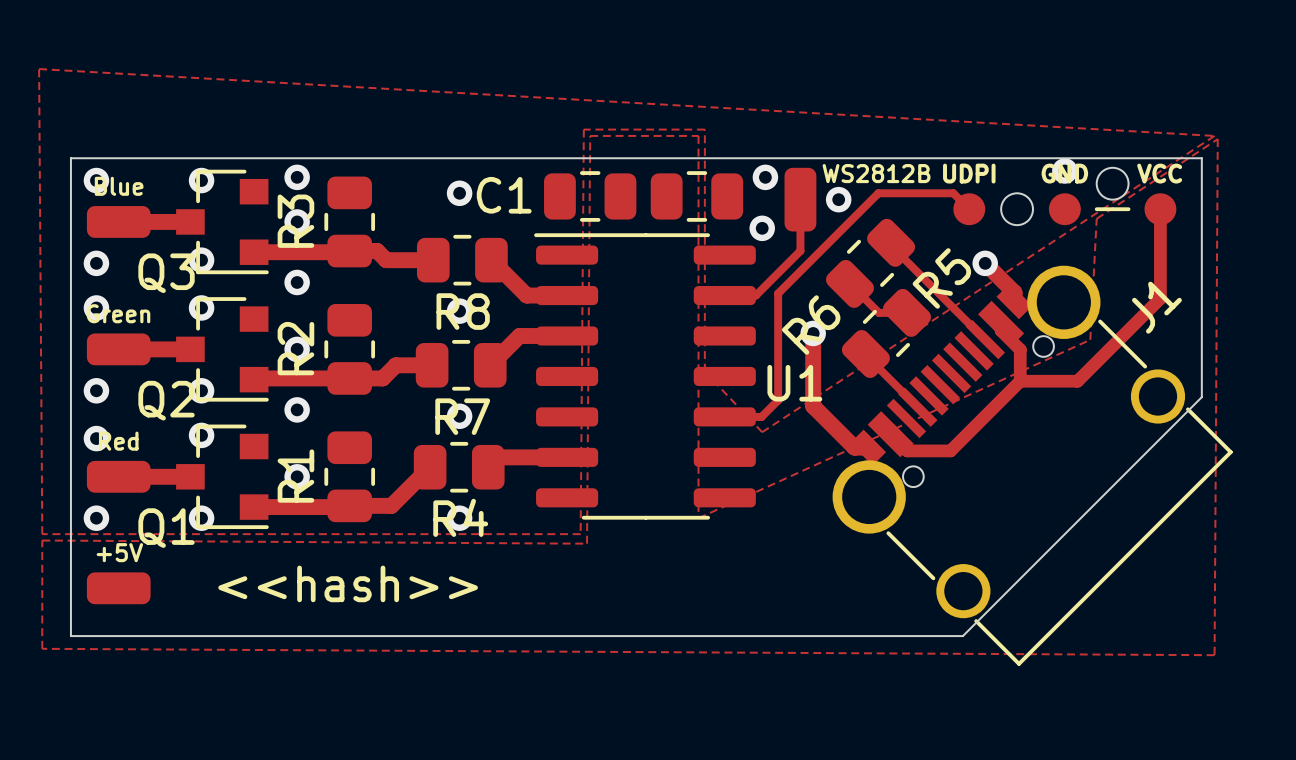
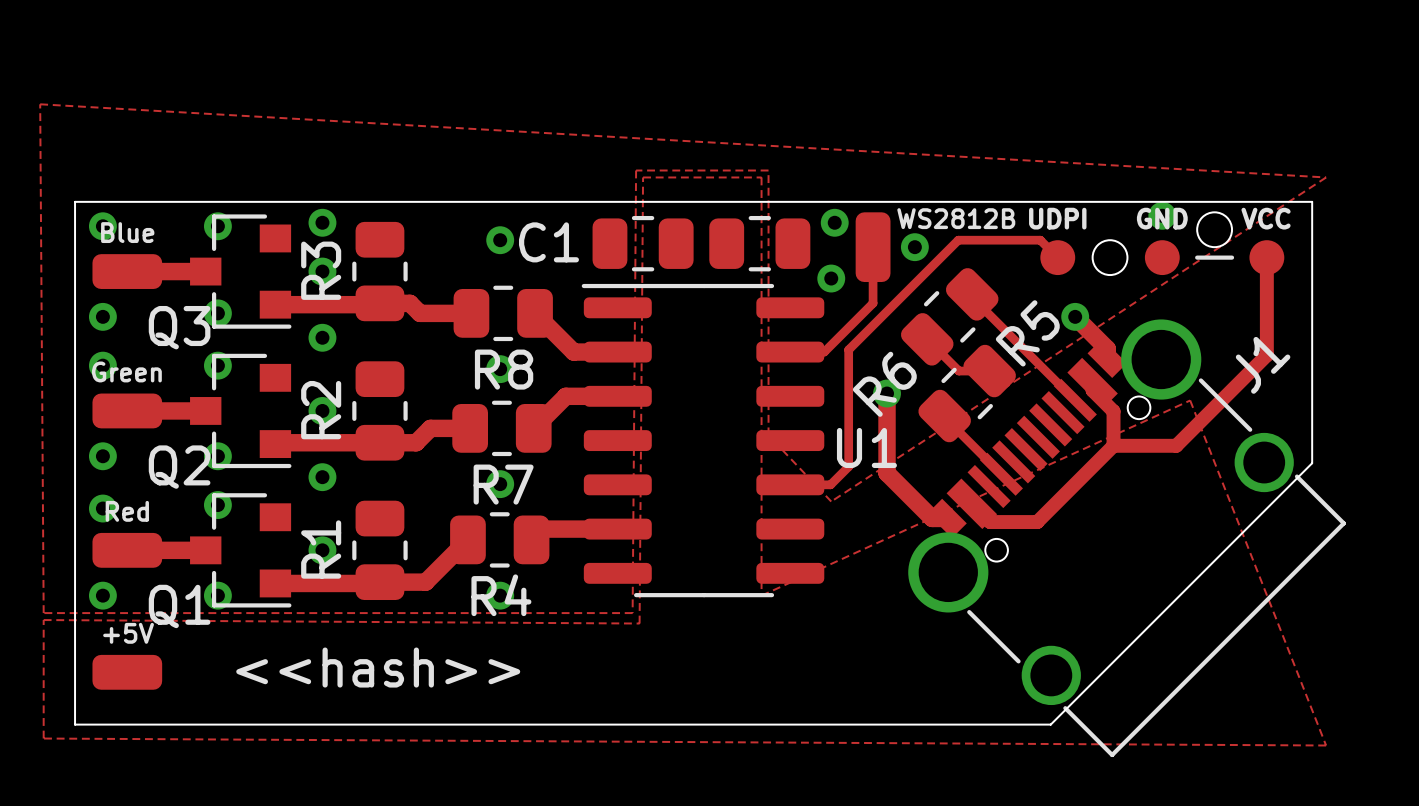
zone outline: (1090, 339) (1096, 218) (1217, 139) (1214, 655) -> (1190, 400) (1326, 745)

